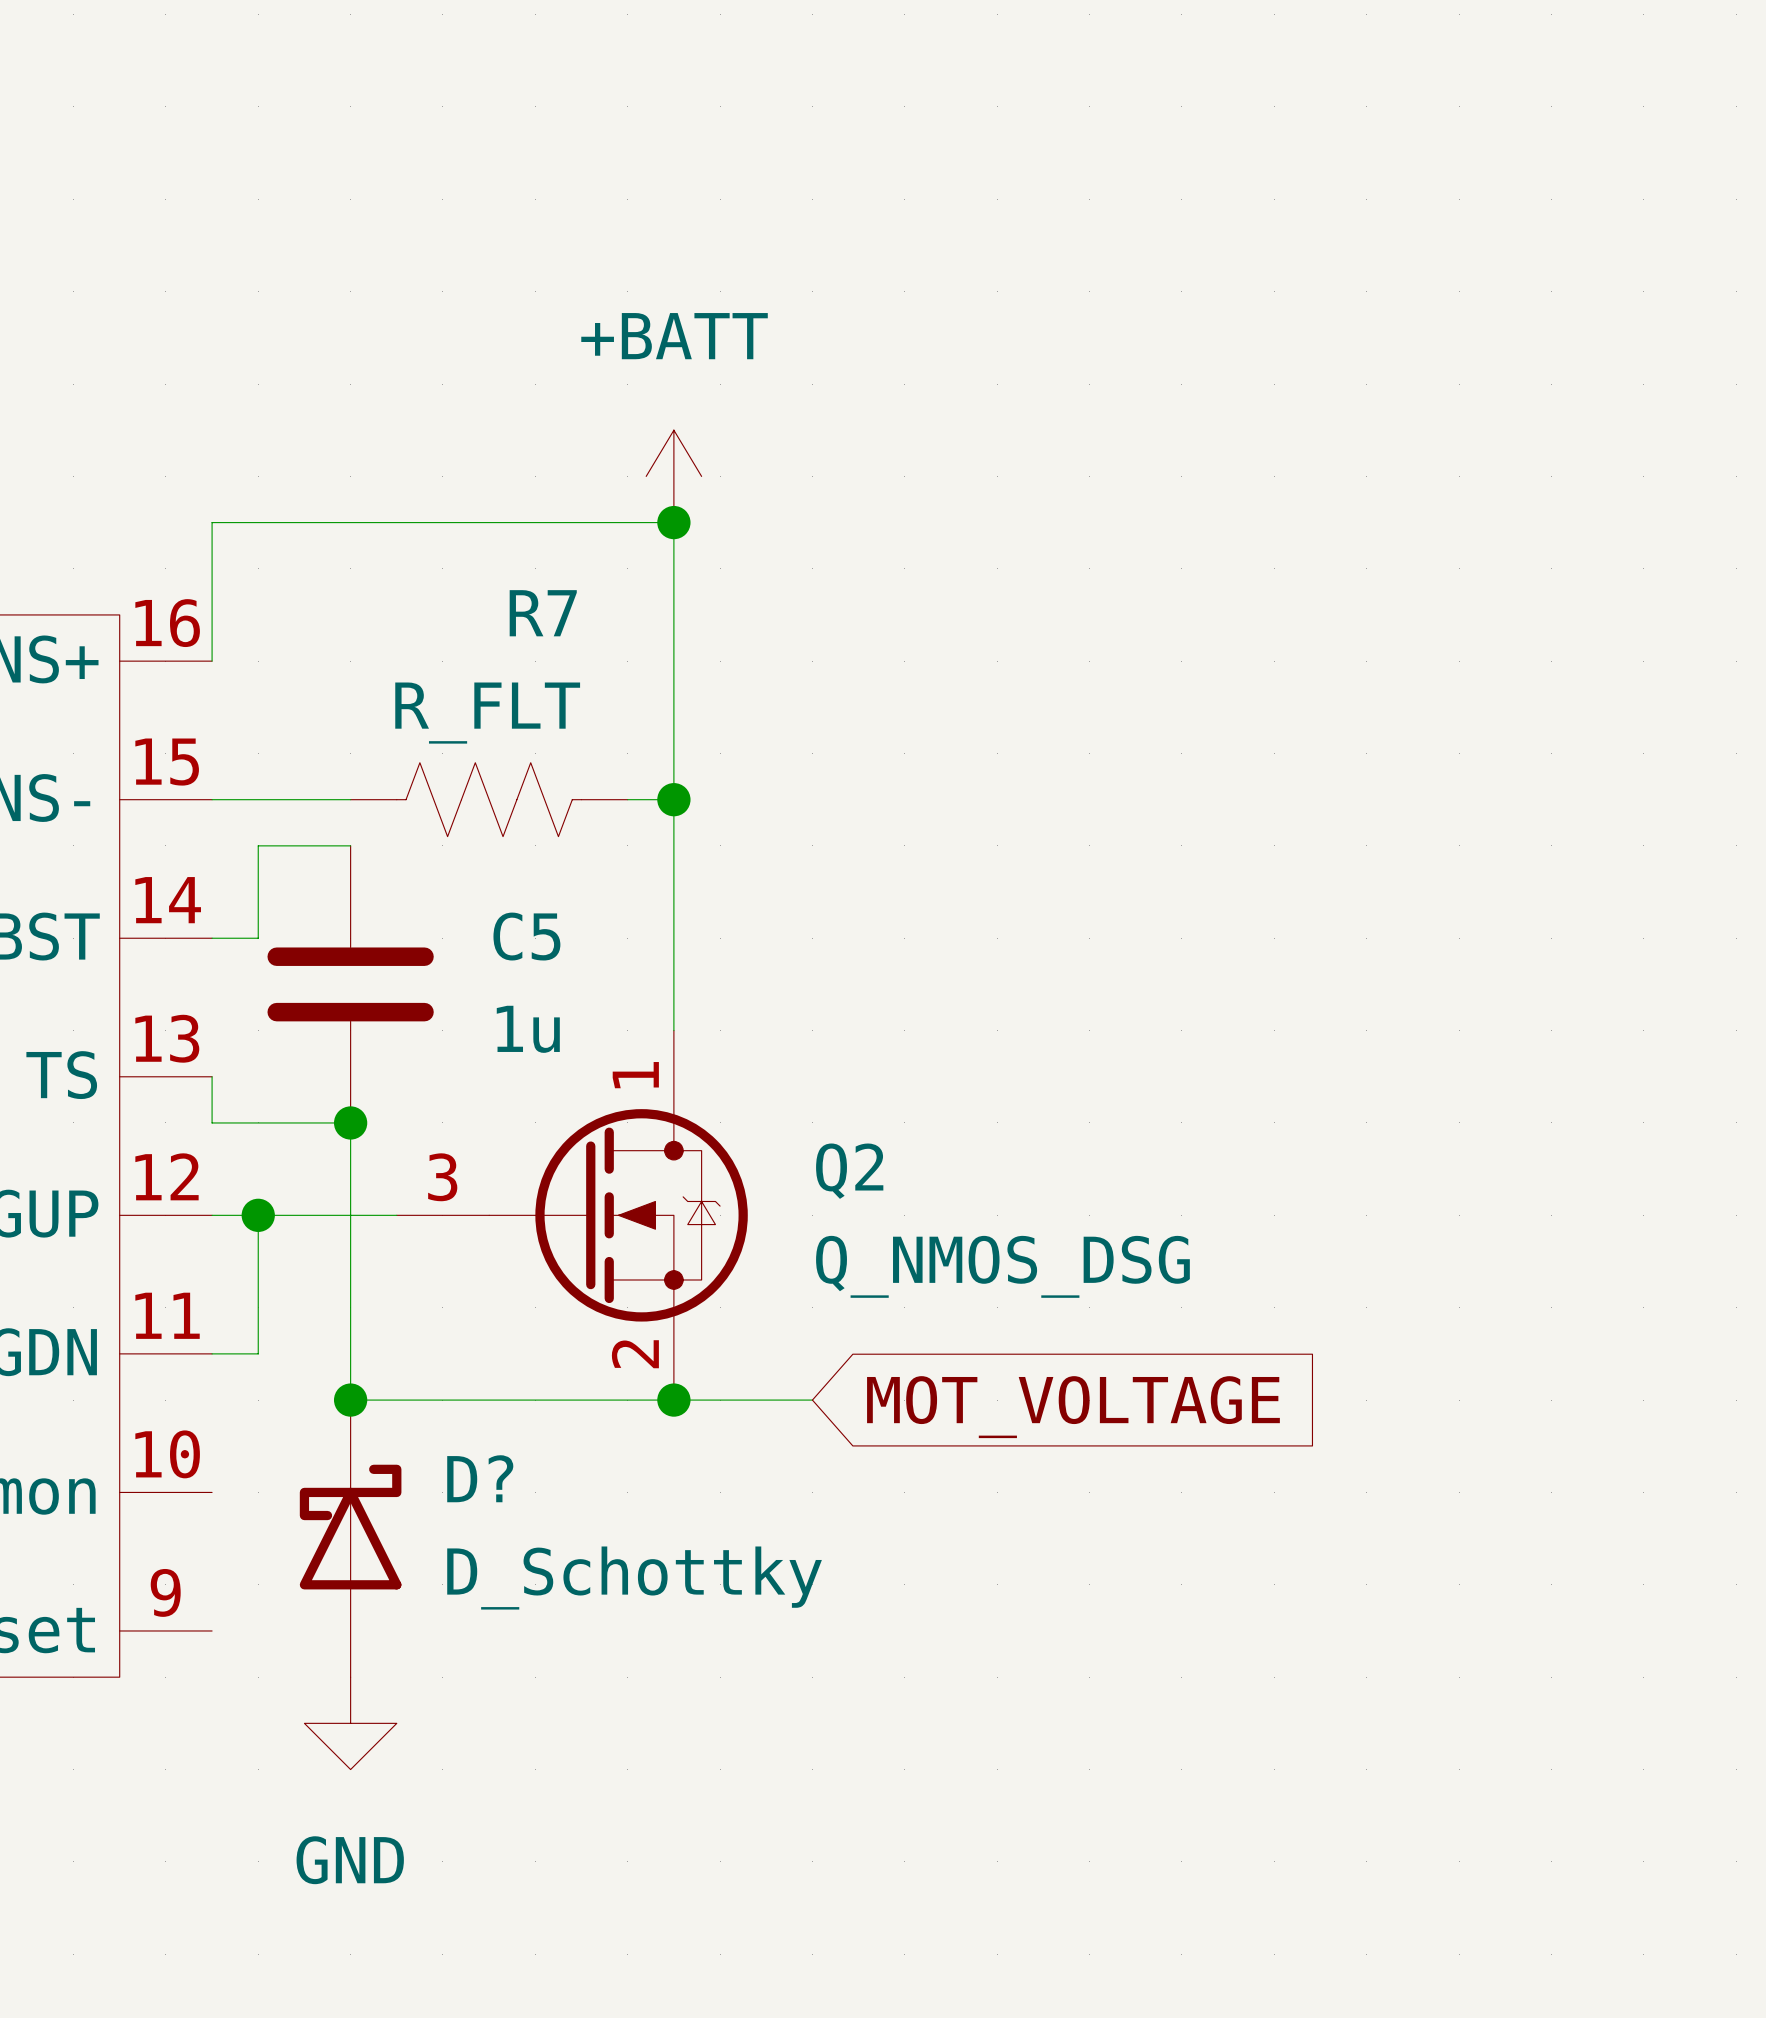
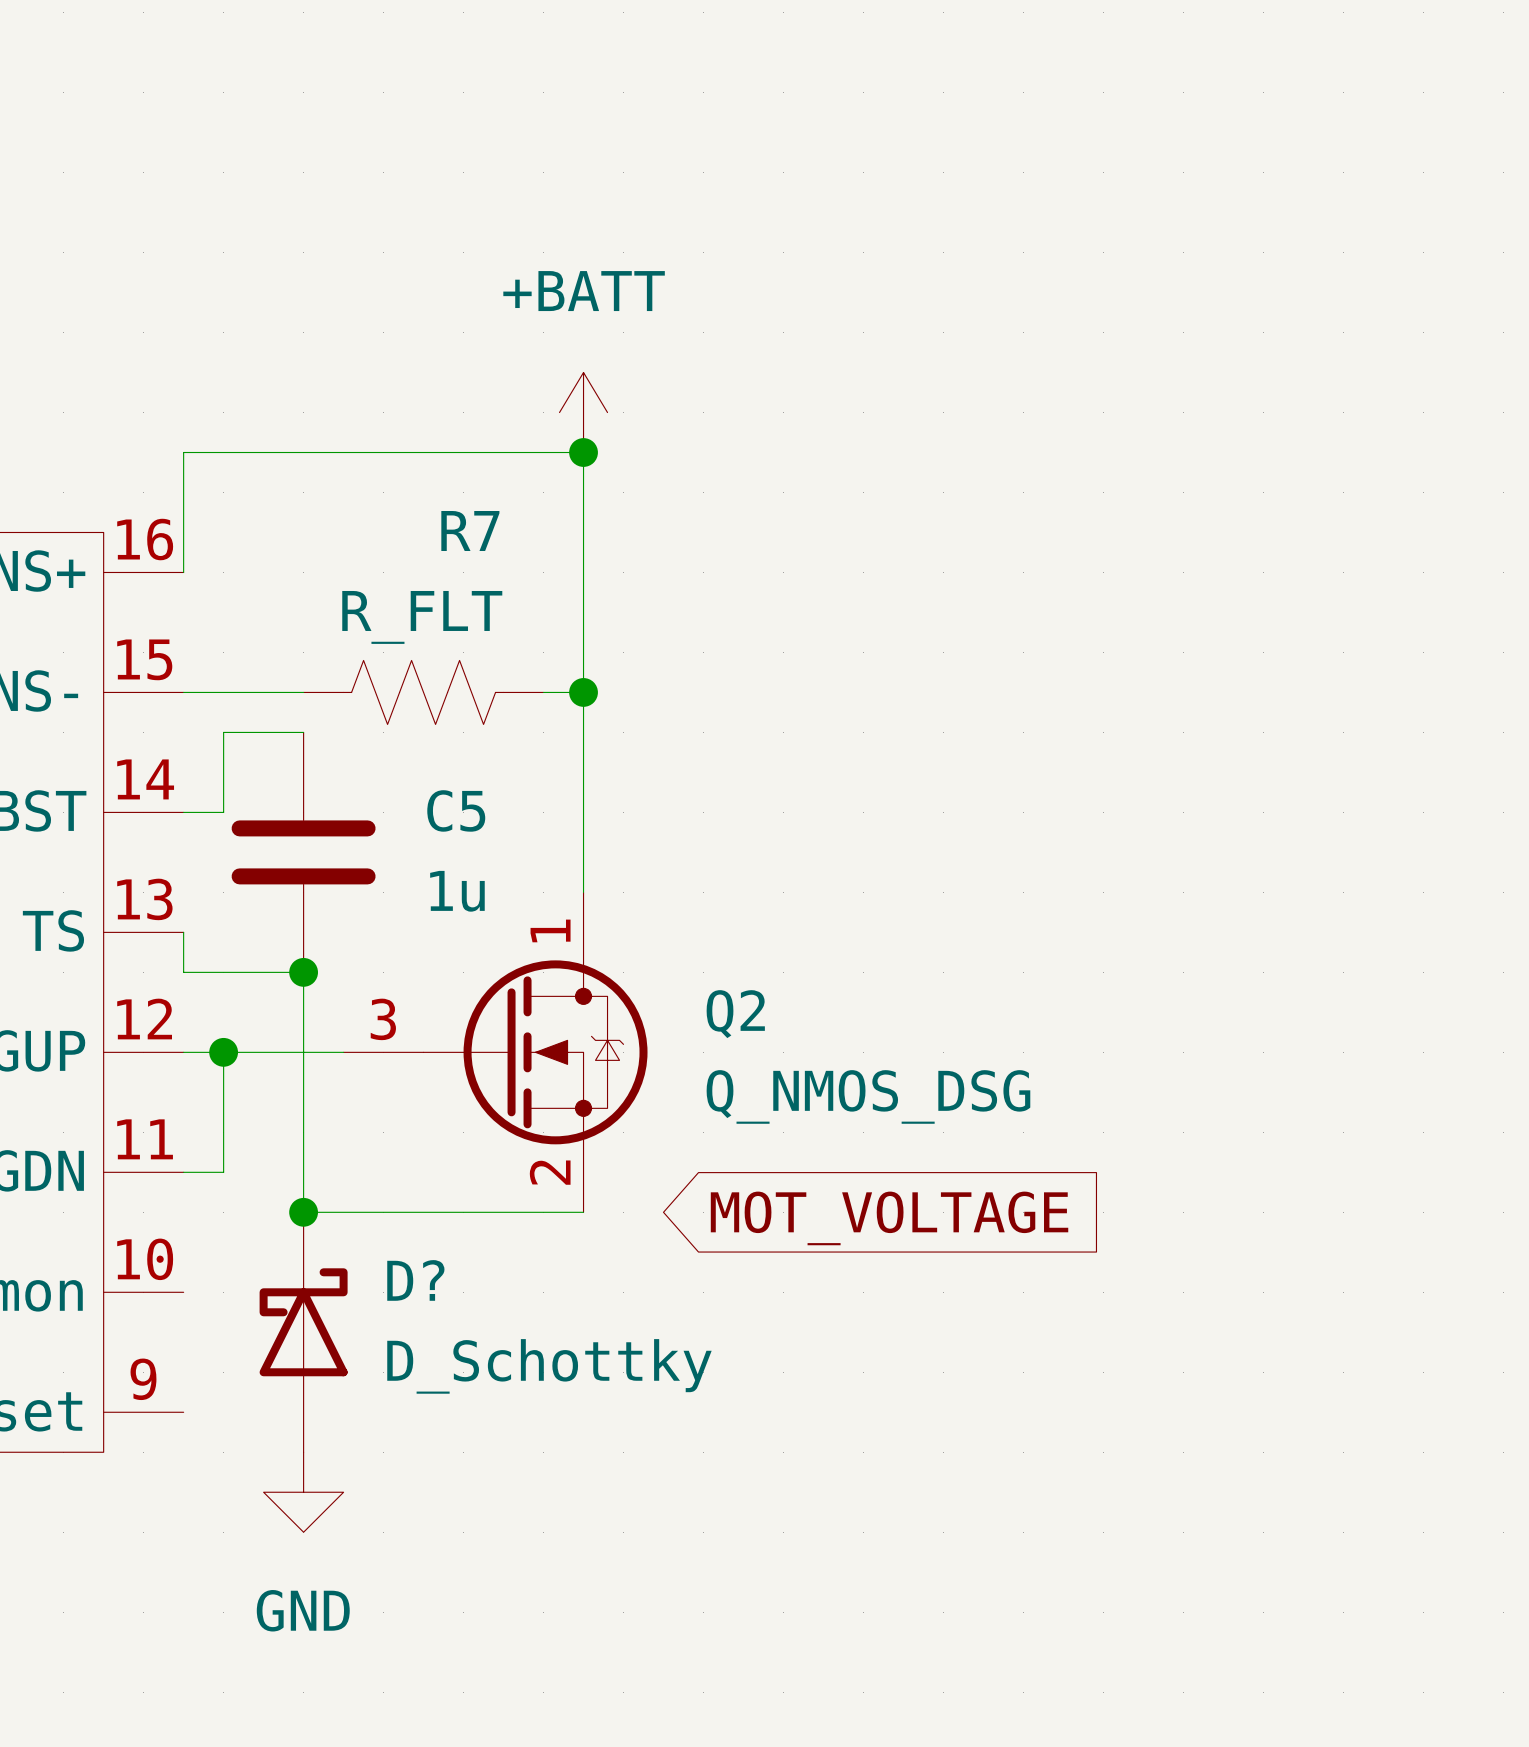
wire: (673, 1400) (812, 1400) -> none
junction: (673, 1400) -> none
global label position: MOT_VOLTAGE (1073, 1407) -> MOT_VOLTAGE (889, 1218)

